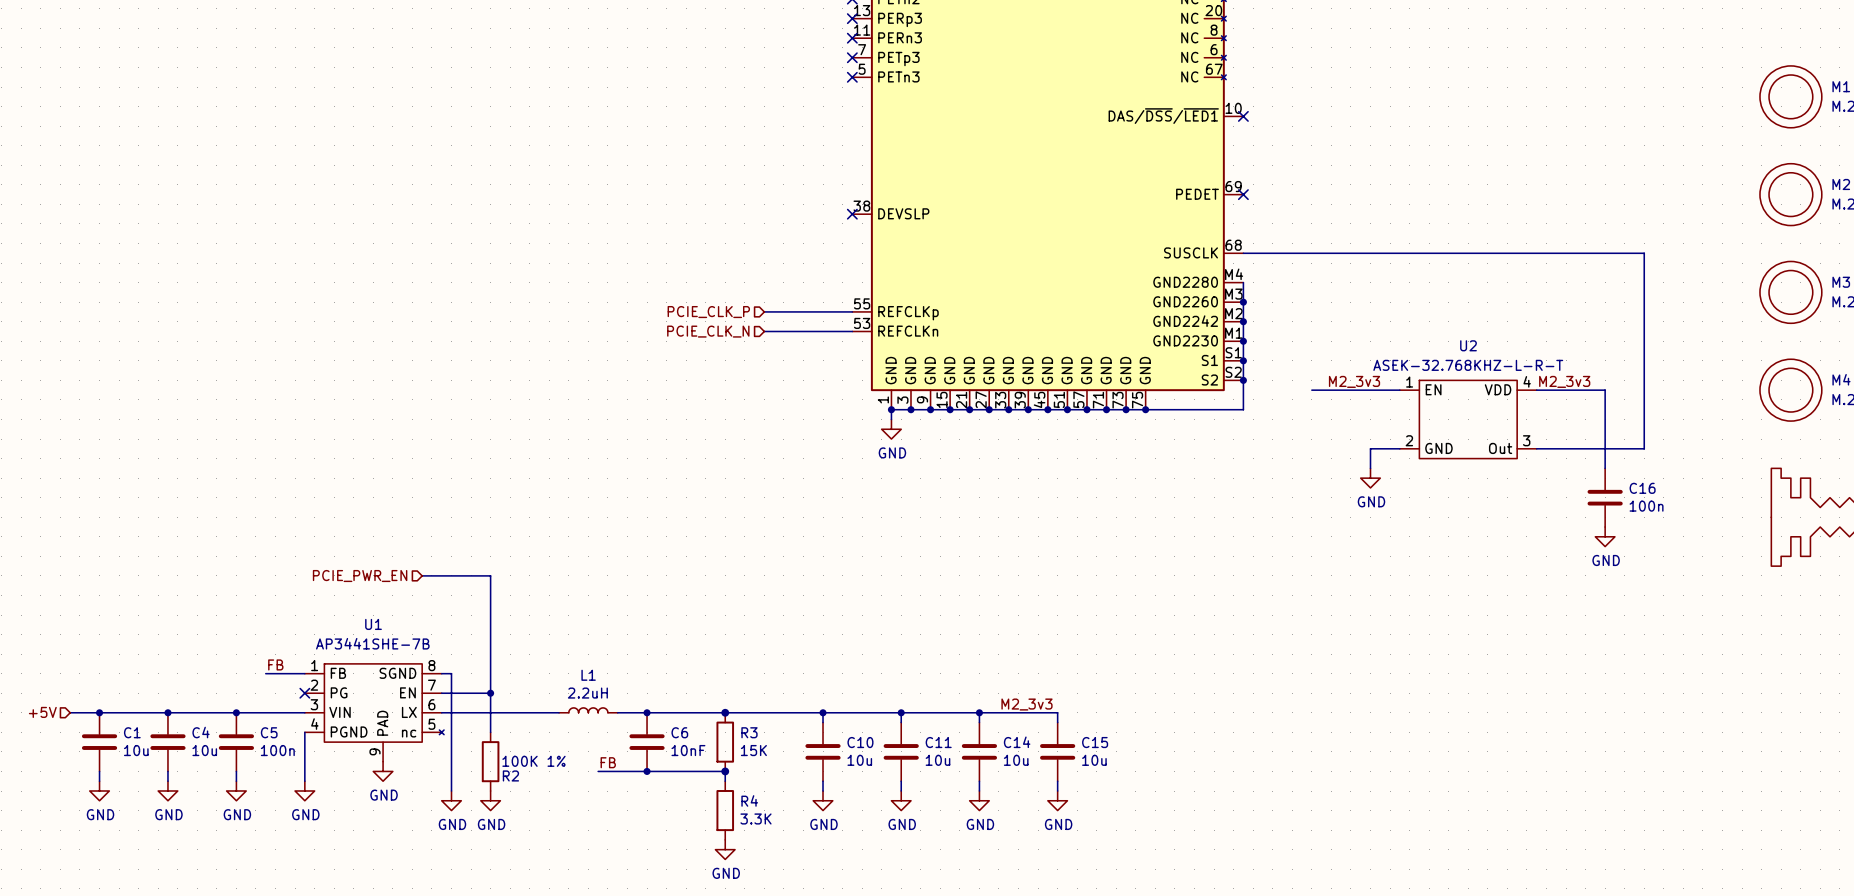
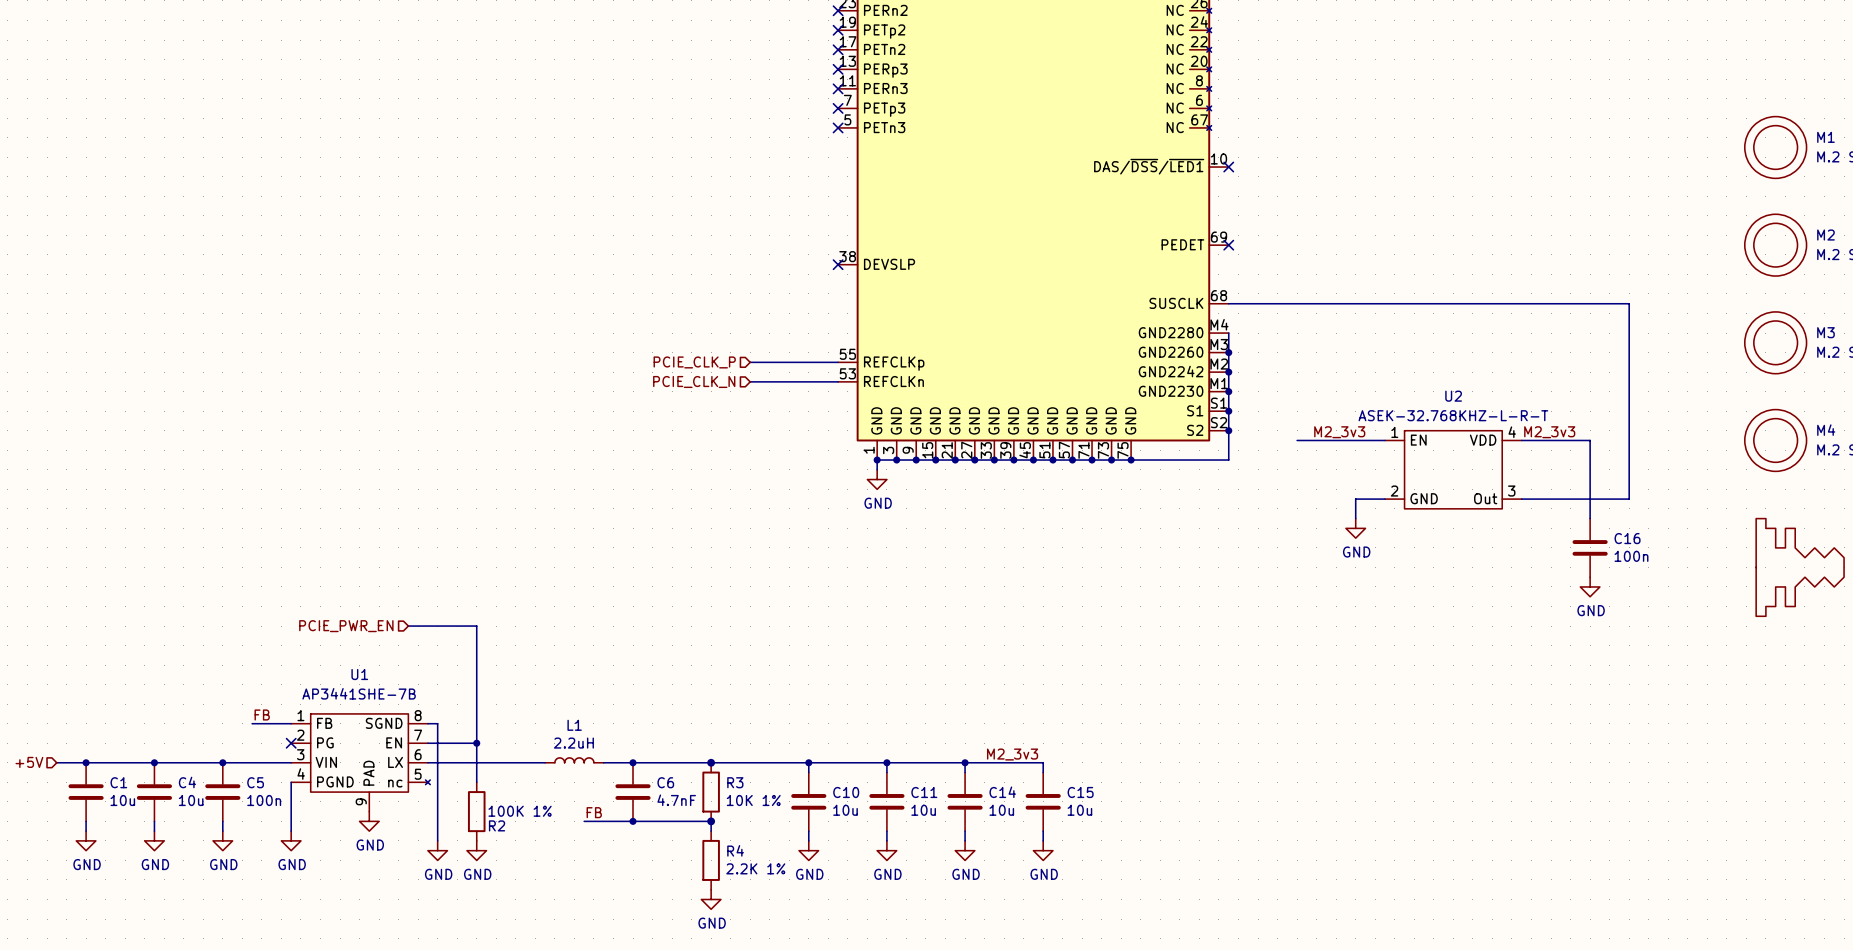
C6 value: 10nF (688, 750) -> 4.7nF (676, 800)
R3 value: 15K (753, 750) -> 10K 1% (753, 800)
R4 value: 3.3K (755, 818) -> 2.2K 1% (755, 868)

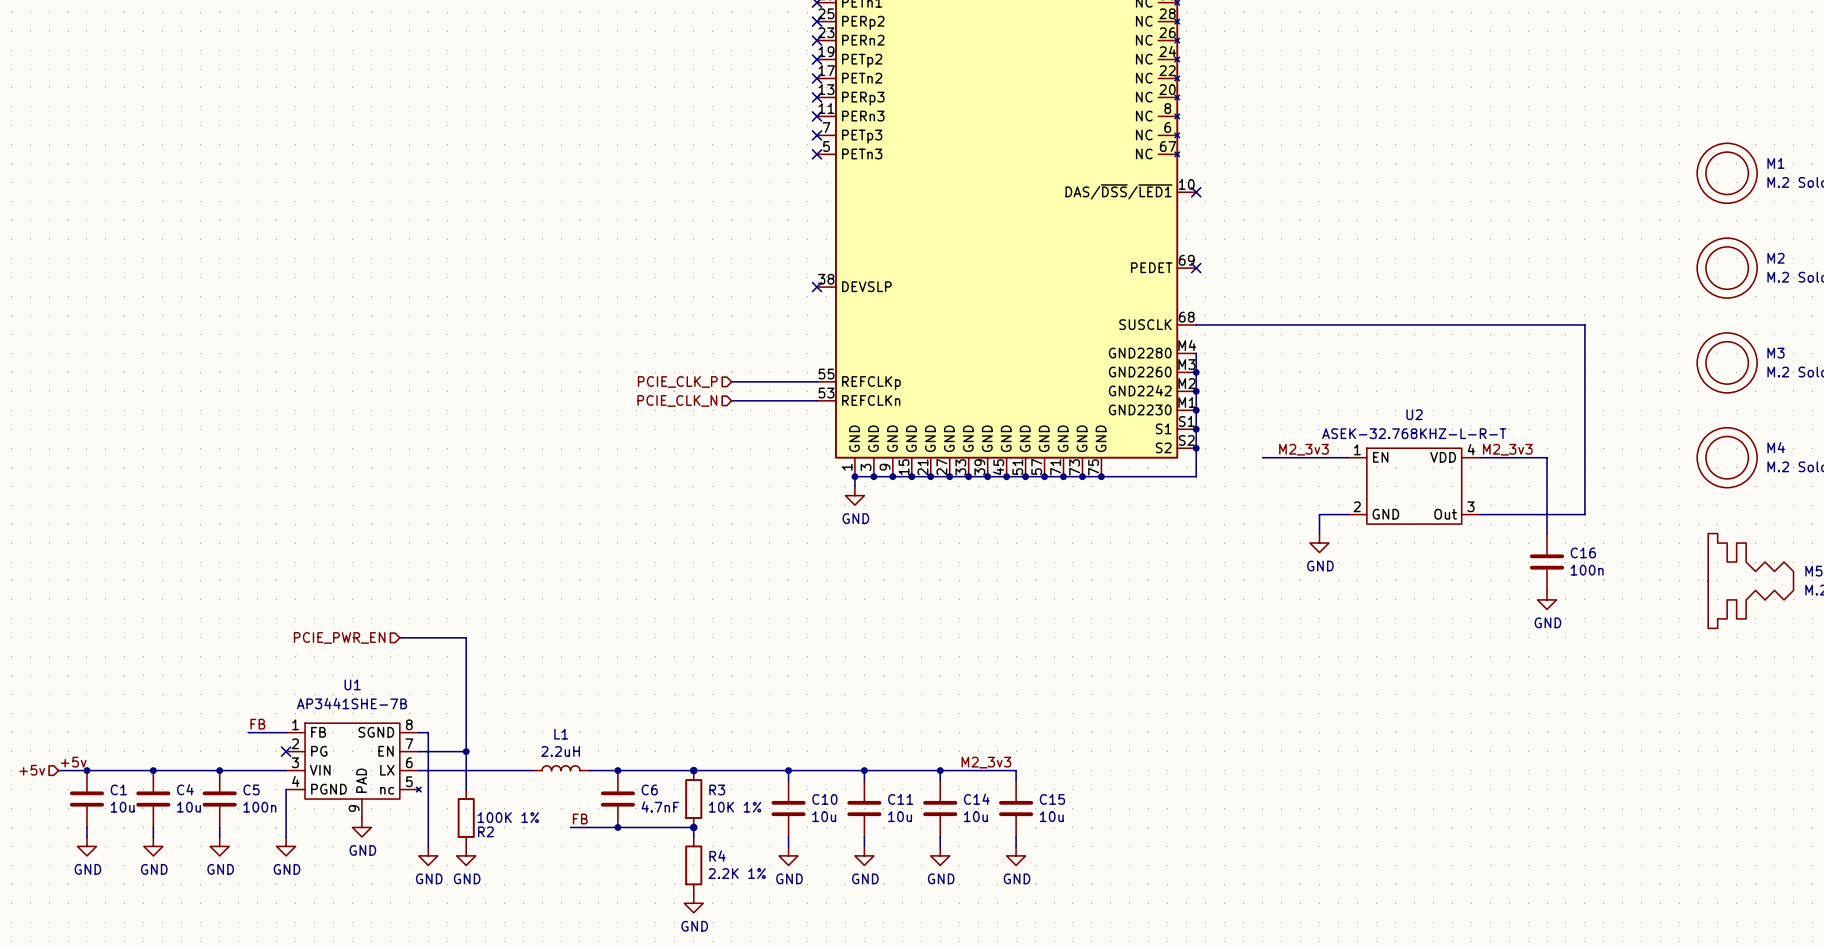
label: none -> +5v (73, 762)
hierarchical label: +5V (29, 762) -> +5v (32, 770)

